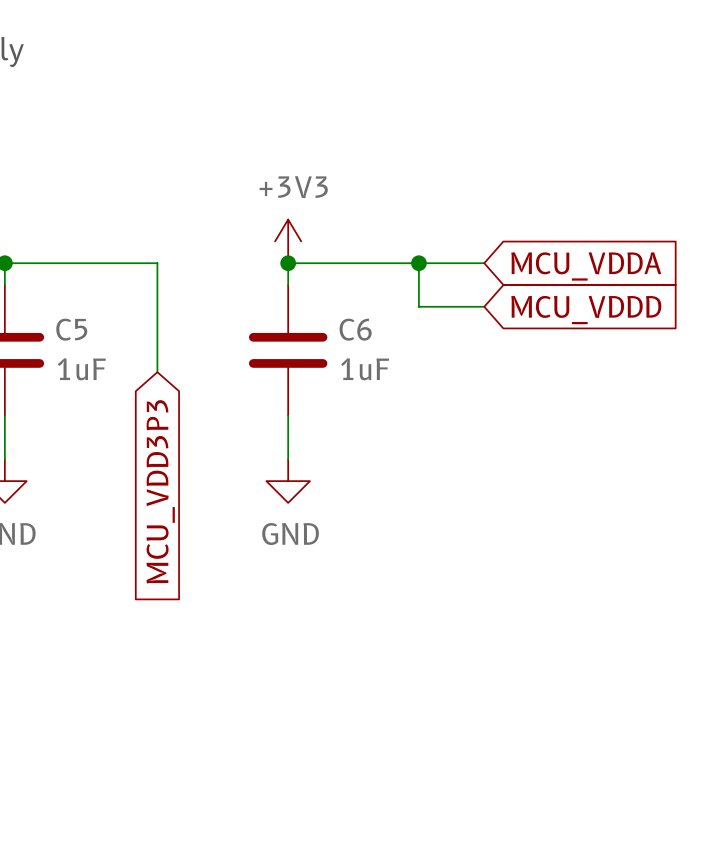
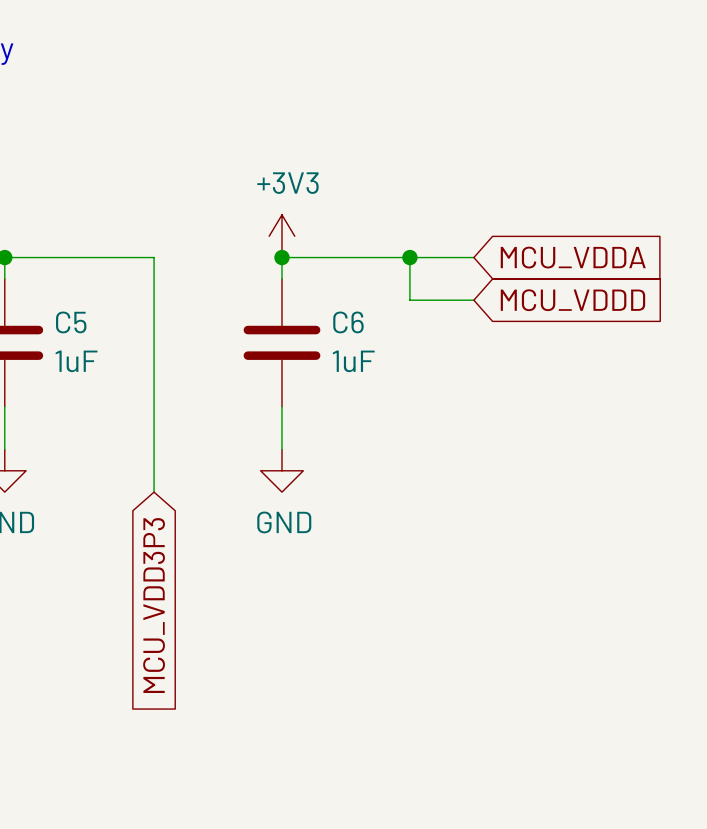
wire: none -> (154, 364) (154, 492)
global label position: MCU_VDD3P3 (160, 491) -> MCU_VDD3P3 (154, 605)

